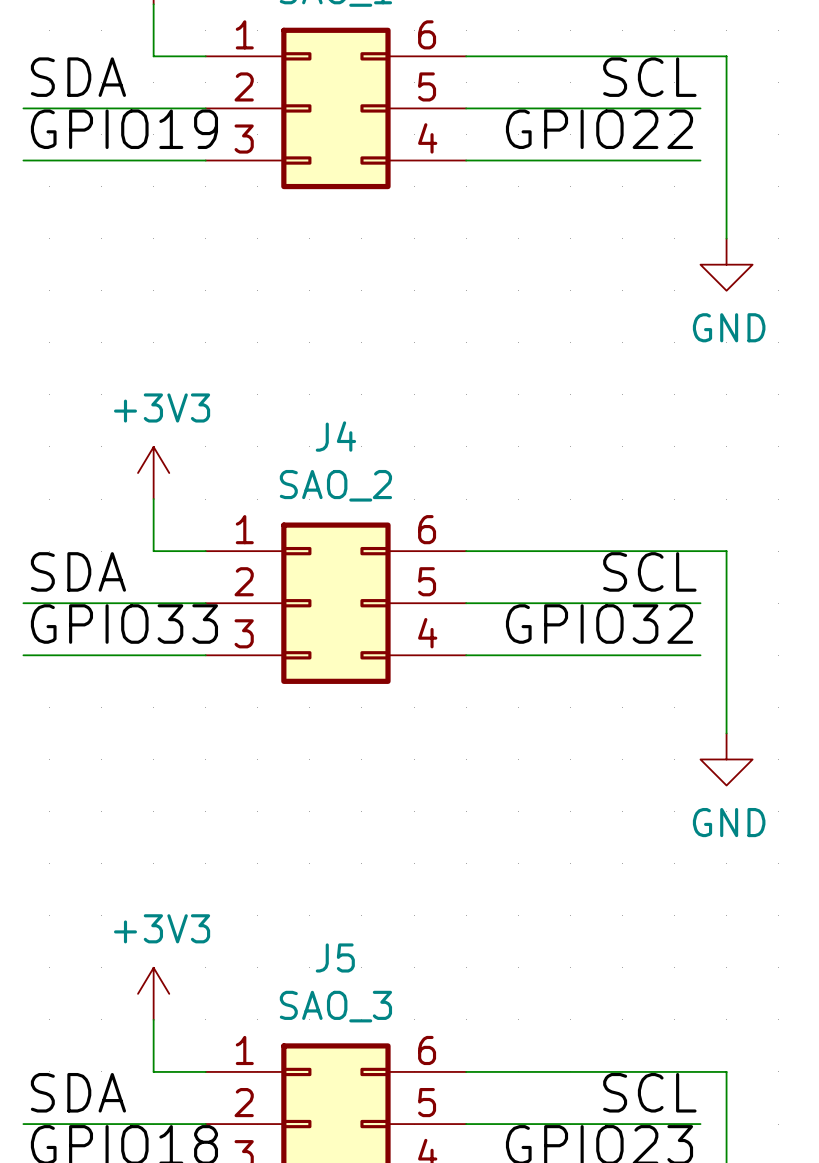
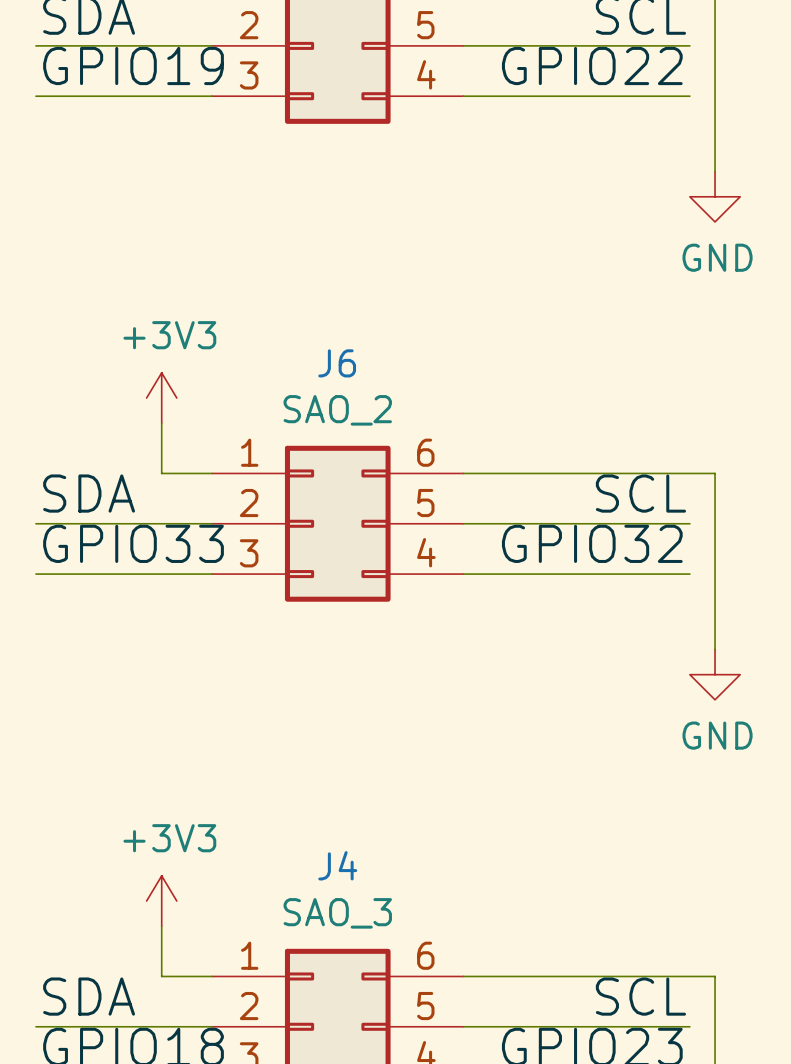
J4 name: J4 (335, 436) -> J6 (337, 363)
J5 name: J5 (335, 957) -> J4 (337, 865)

